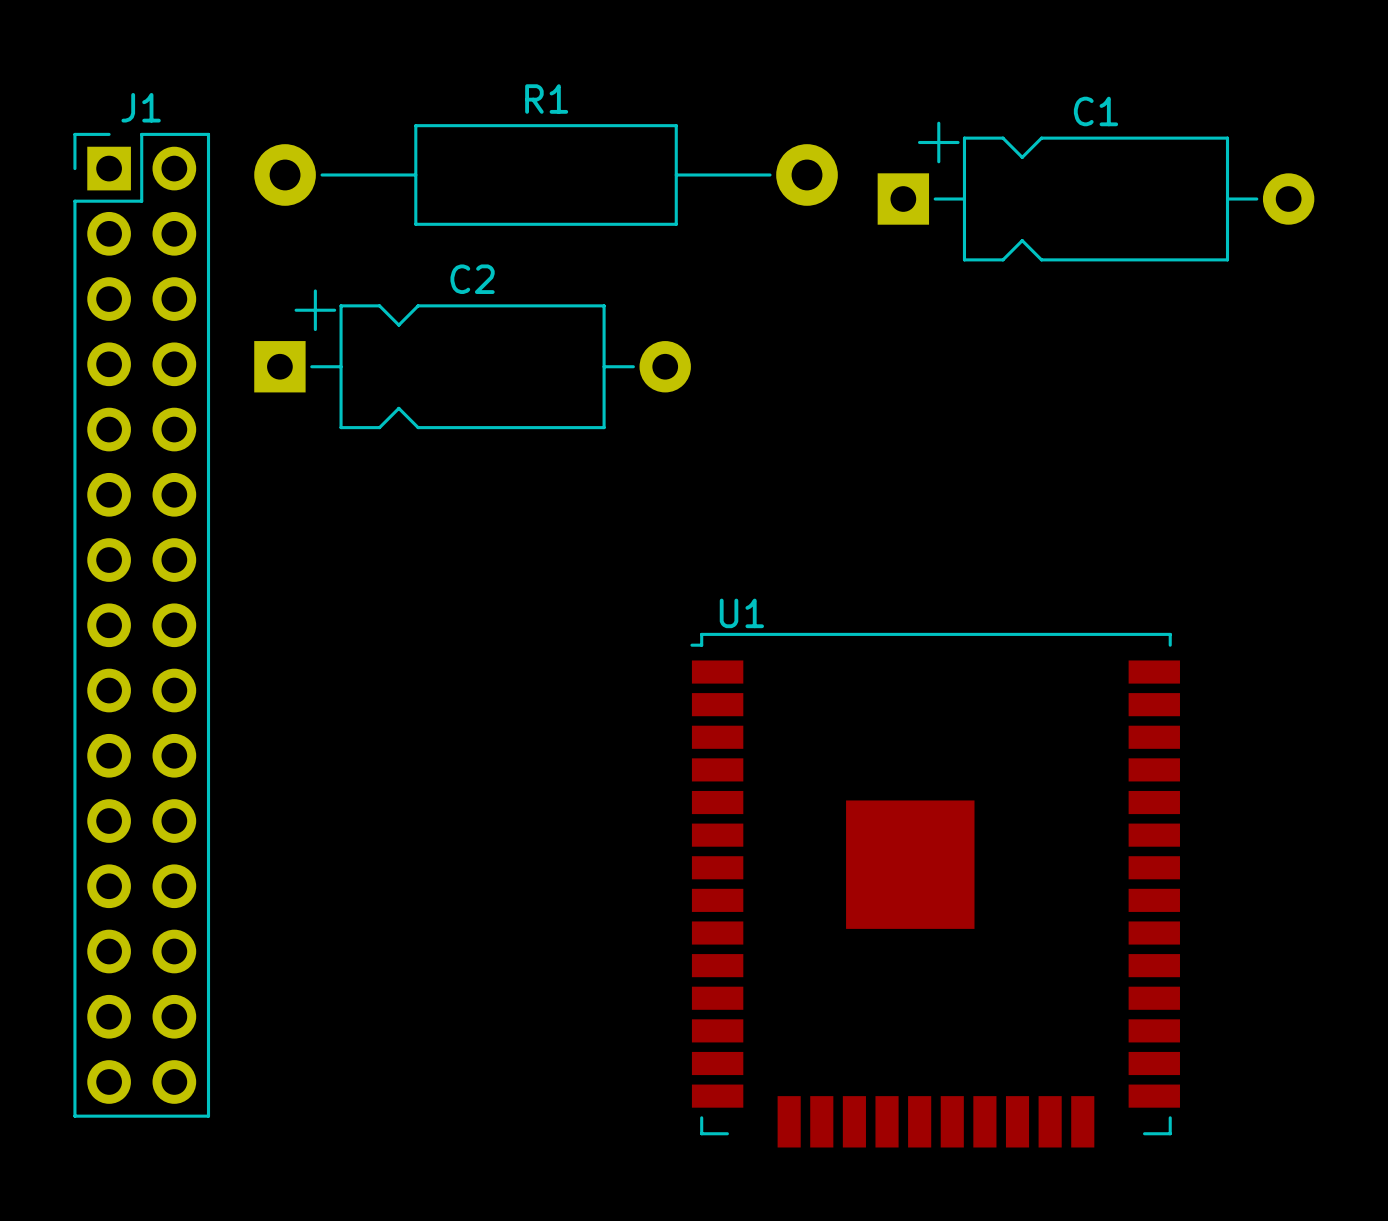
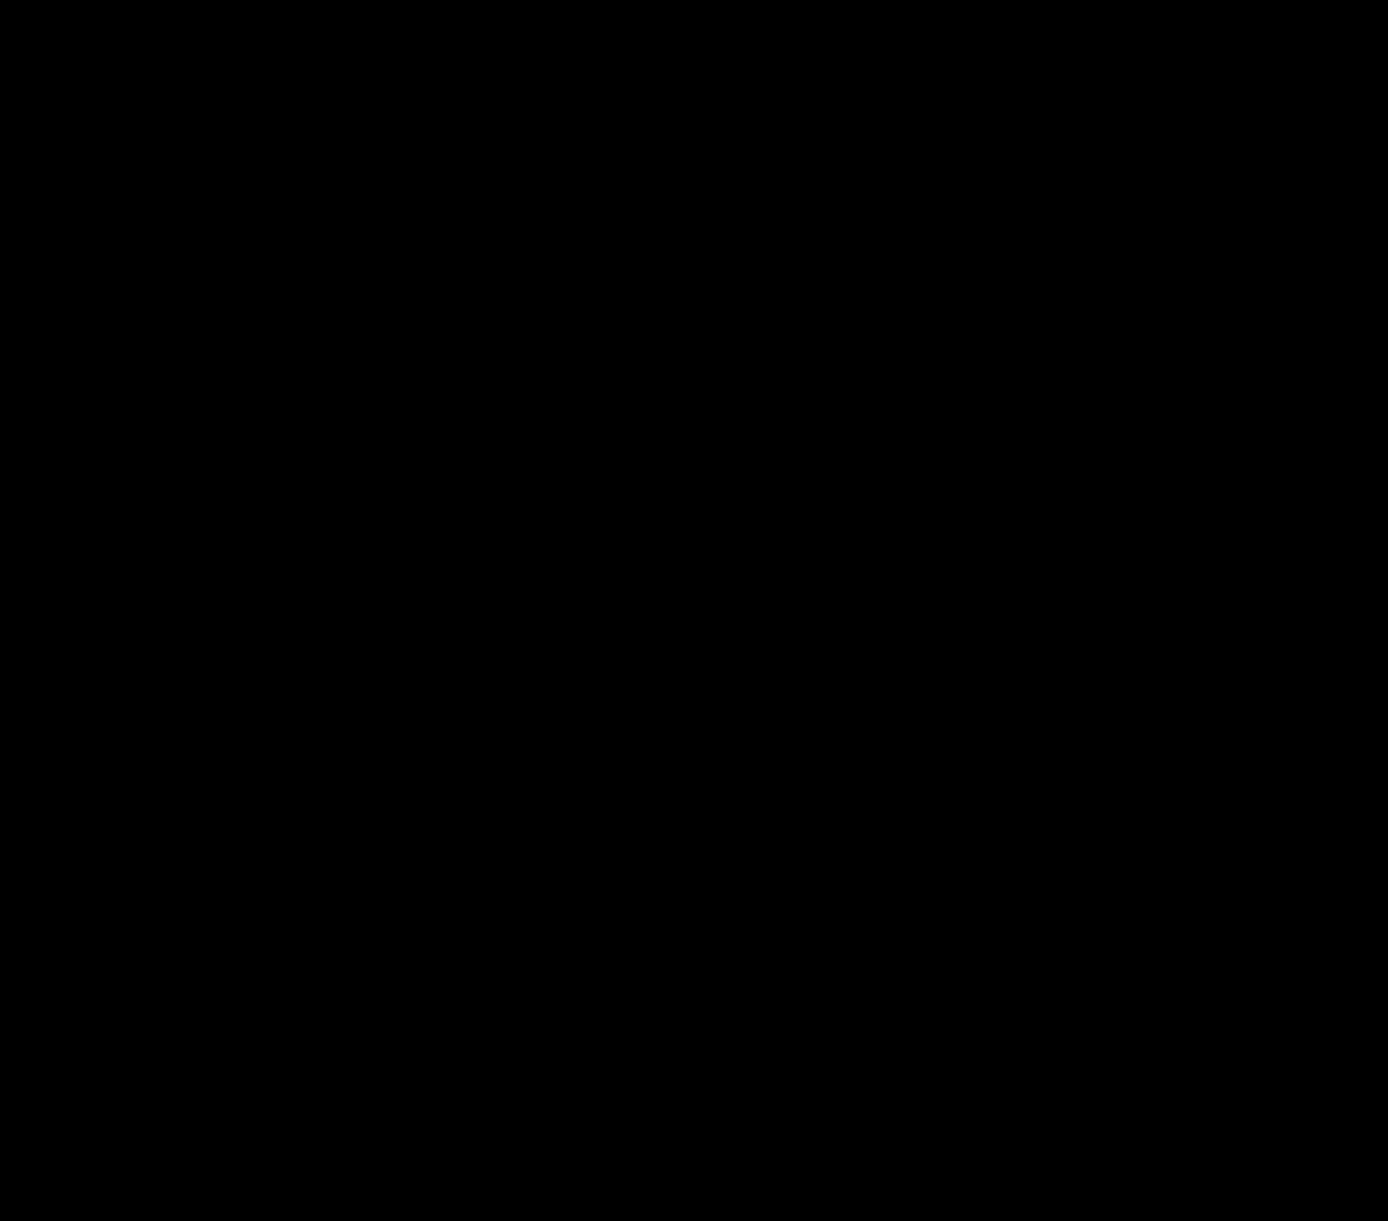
R1: (546, 174) -> none
C1: (1095, 191) -> none
C2: (472, 359) -> none
J1: (141, 625) -> none
U1: (935, 890) -> none

